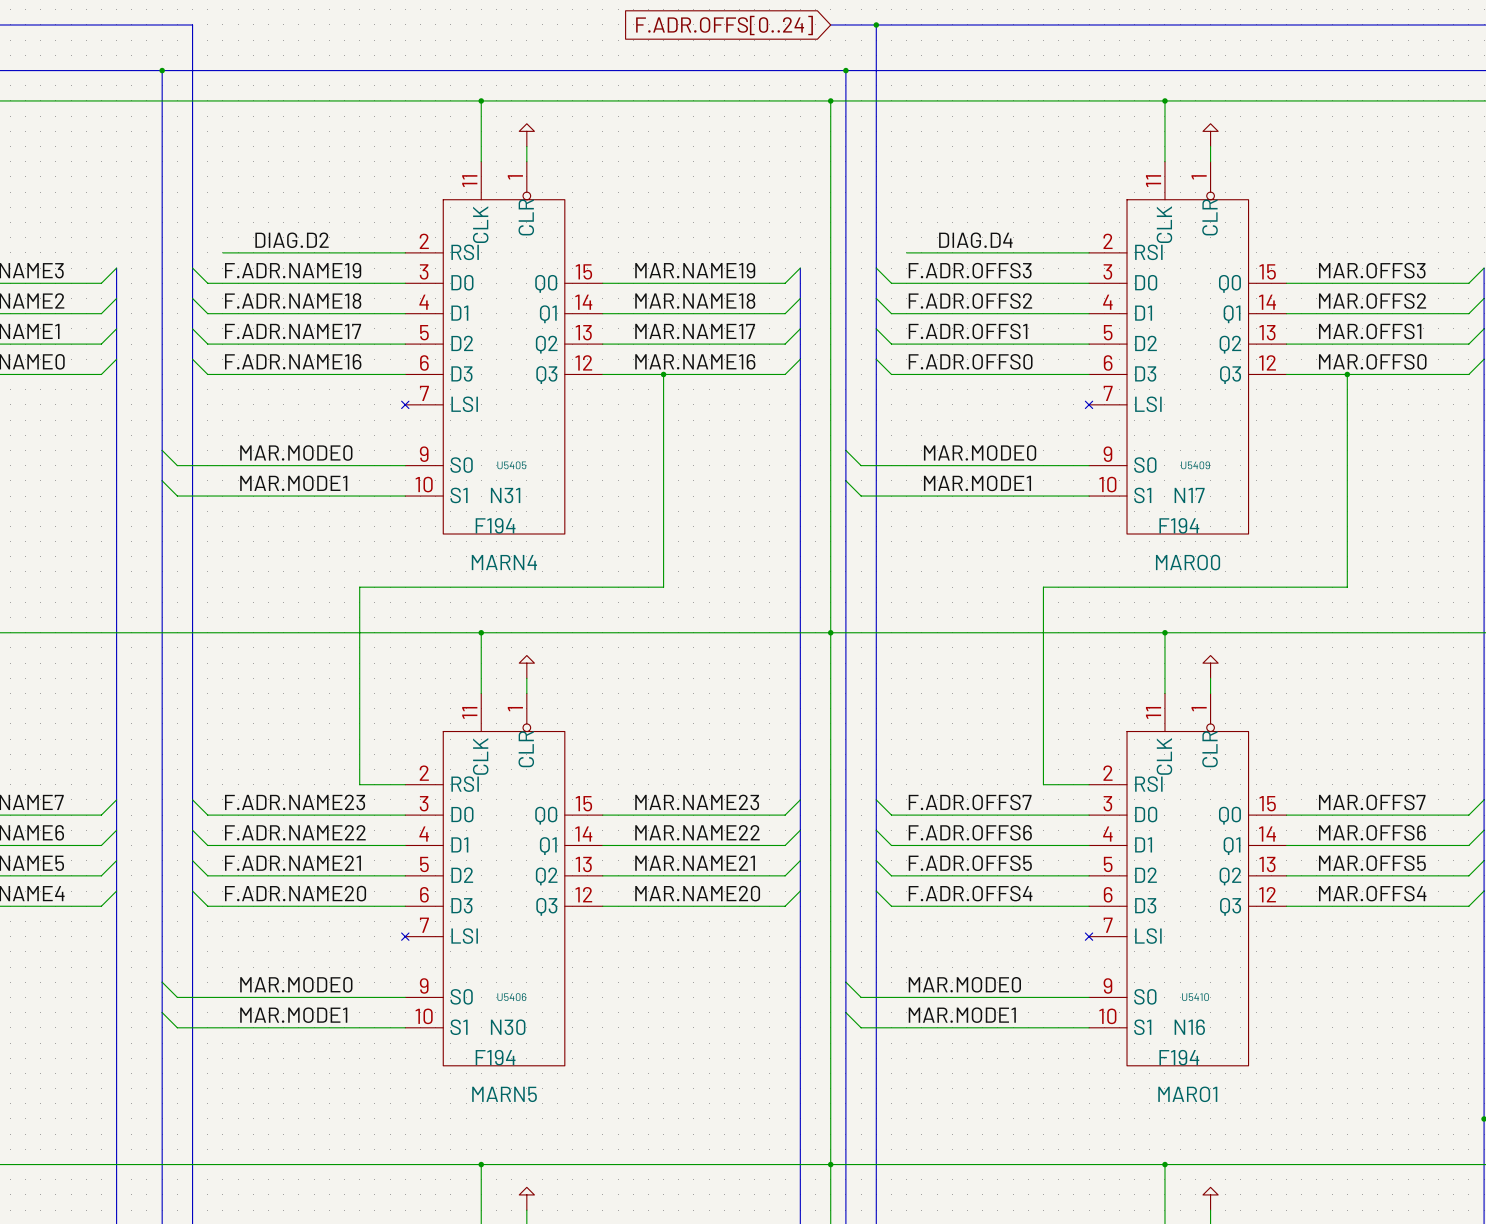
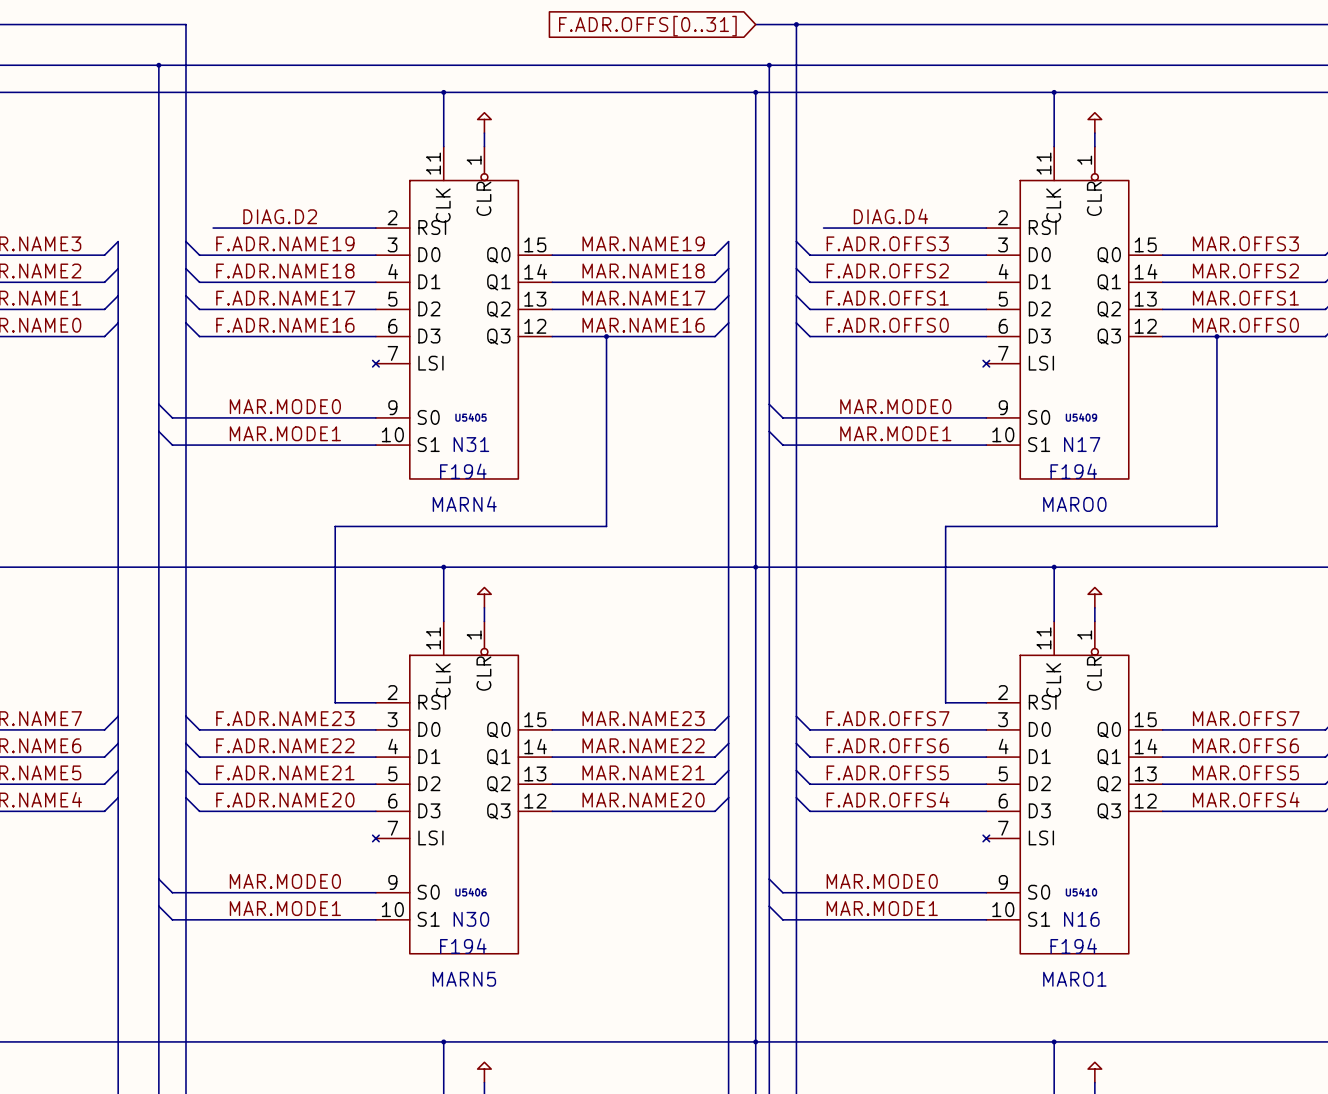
global label: F.ADR.OFFS[0..24] (724, 25) -> F.ADR.OFFS[0..31] (647, 26)

